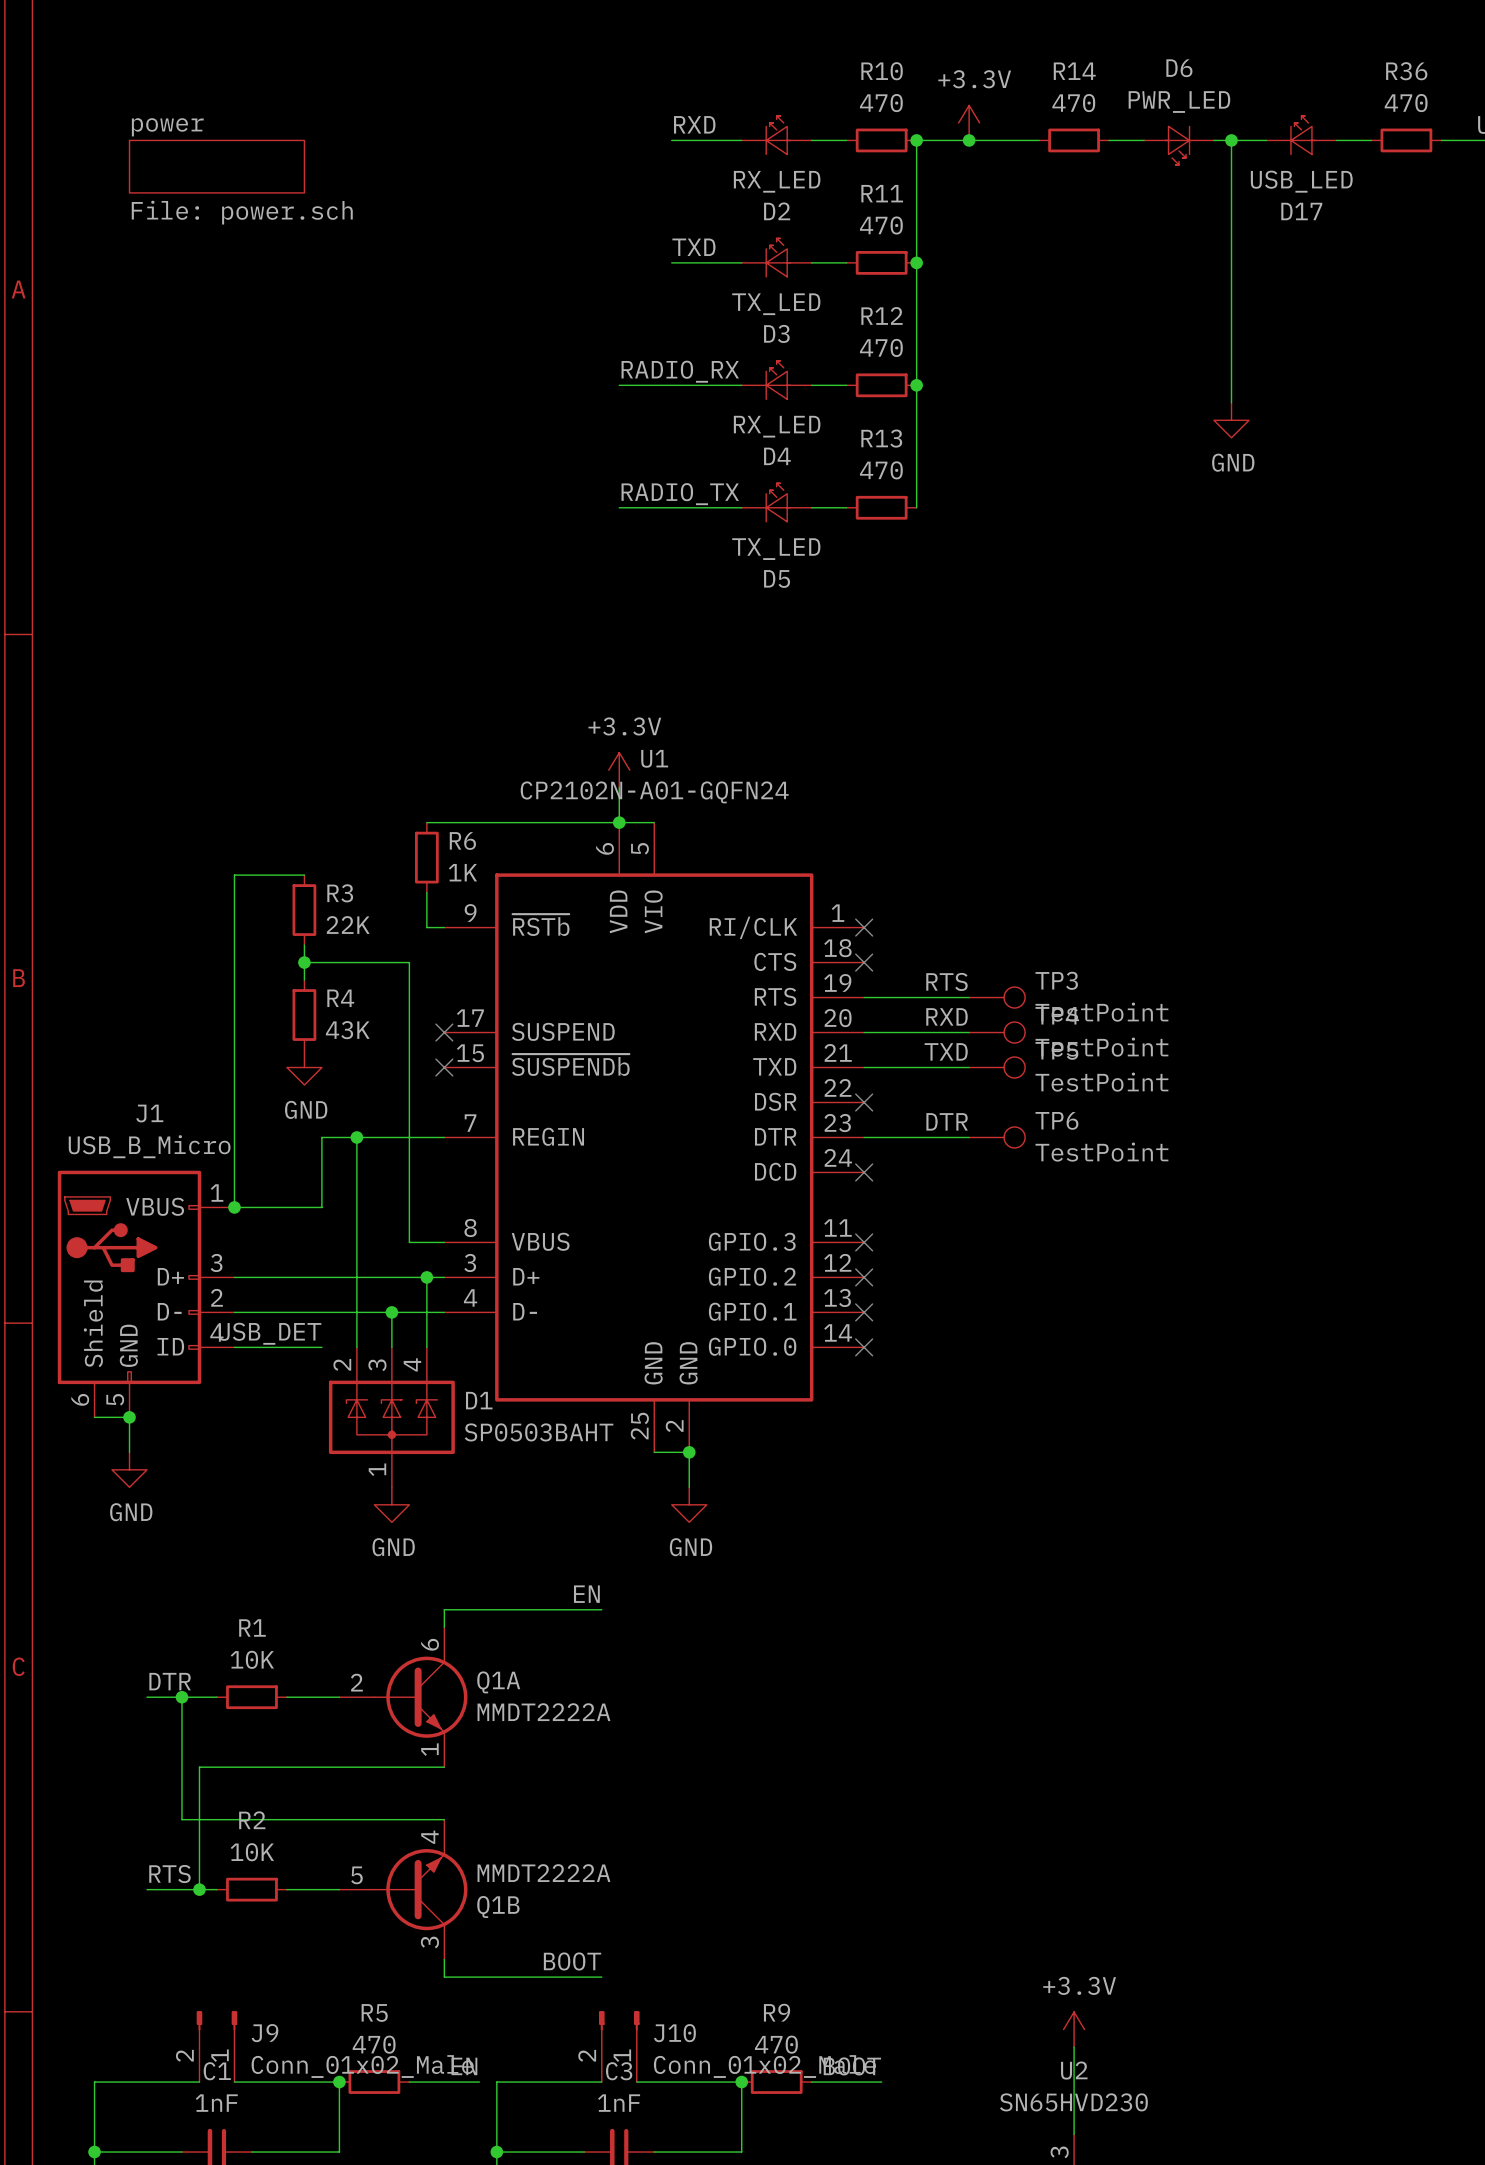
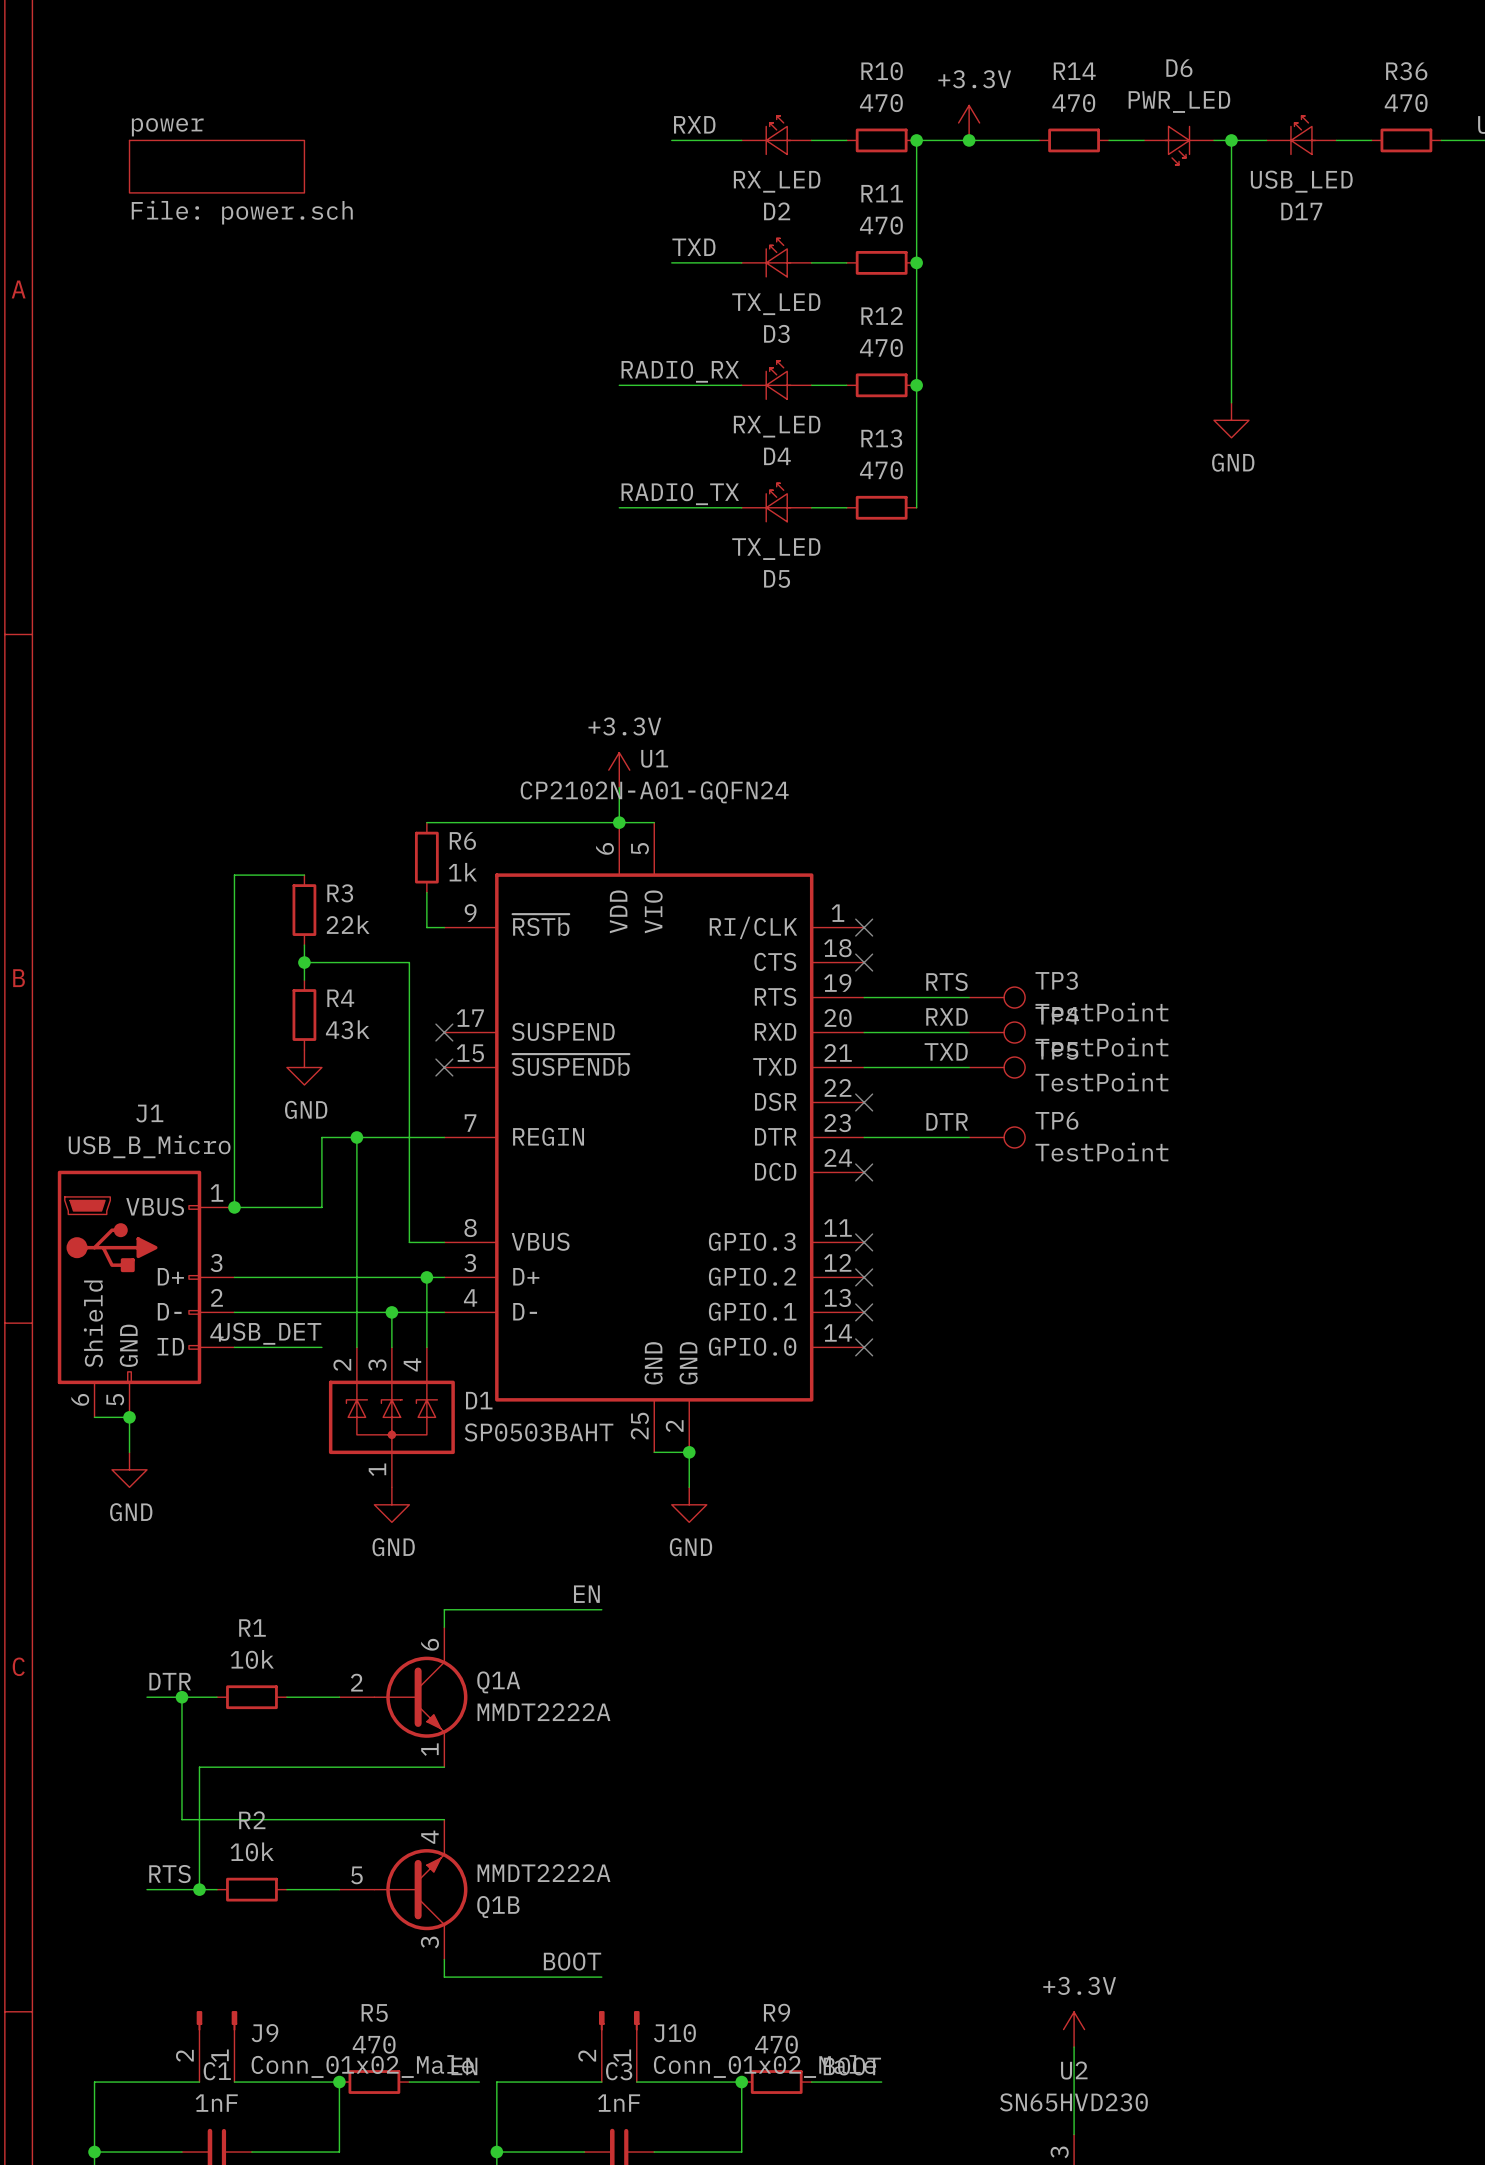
R6 value: 1K (462, 872) -> 1k (462, 872)
R3 value: 22K (348, 925) -> 22k (348, 924)
R4 value: 43K (347, 1030) -> 43k (347, 1029)
R1 value: 10K (252, 1659) -> 10k (252, 1659)
R2 value: 10K (252, 1852) -> 10k (252, 1851)

